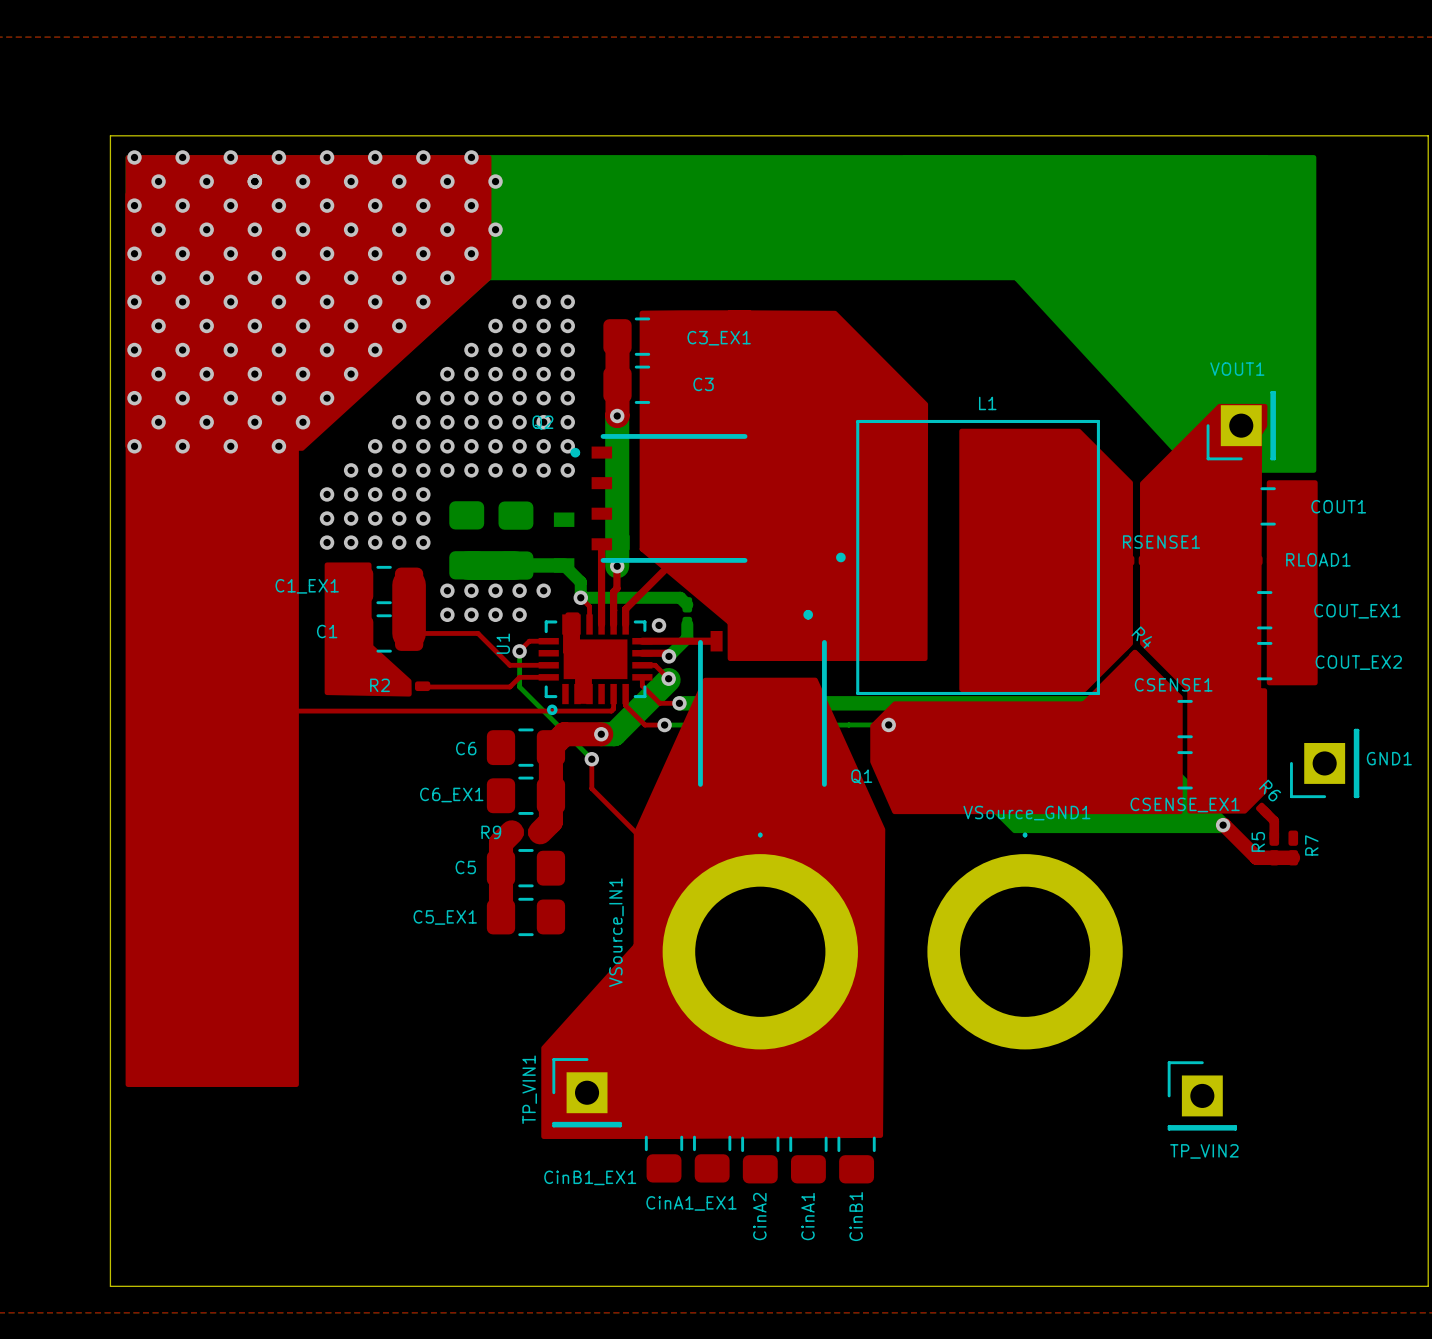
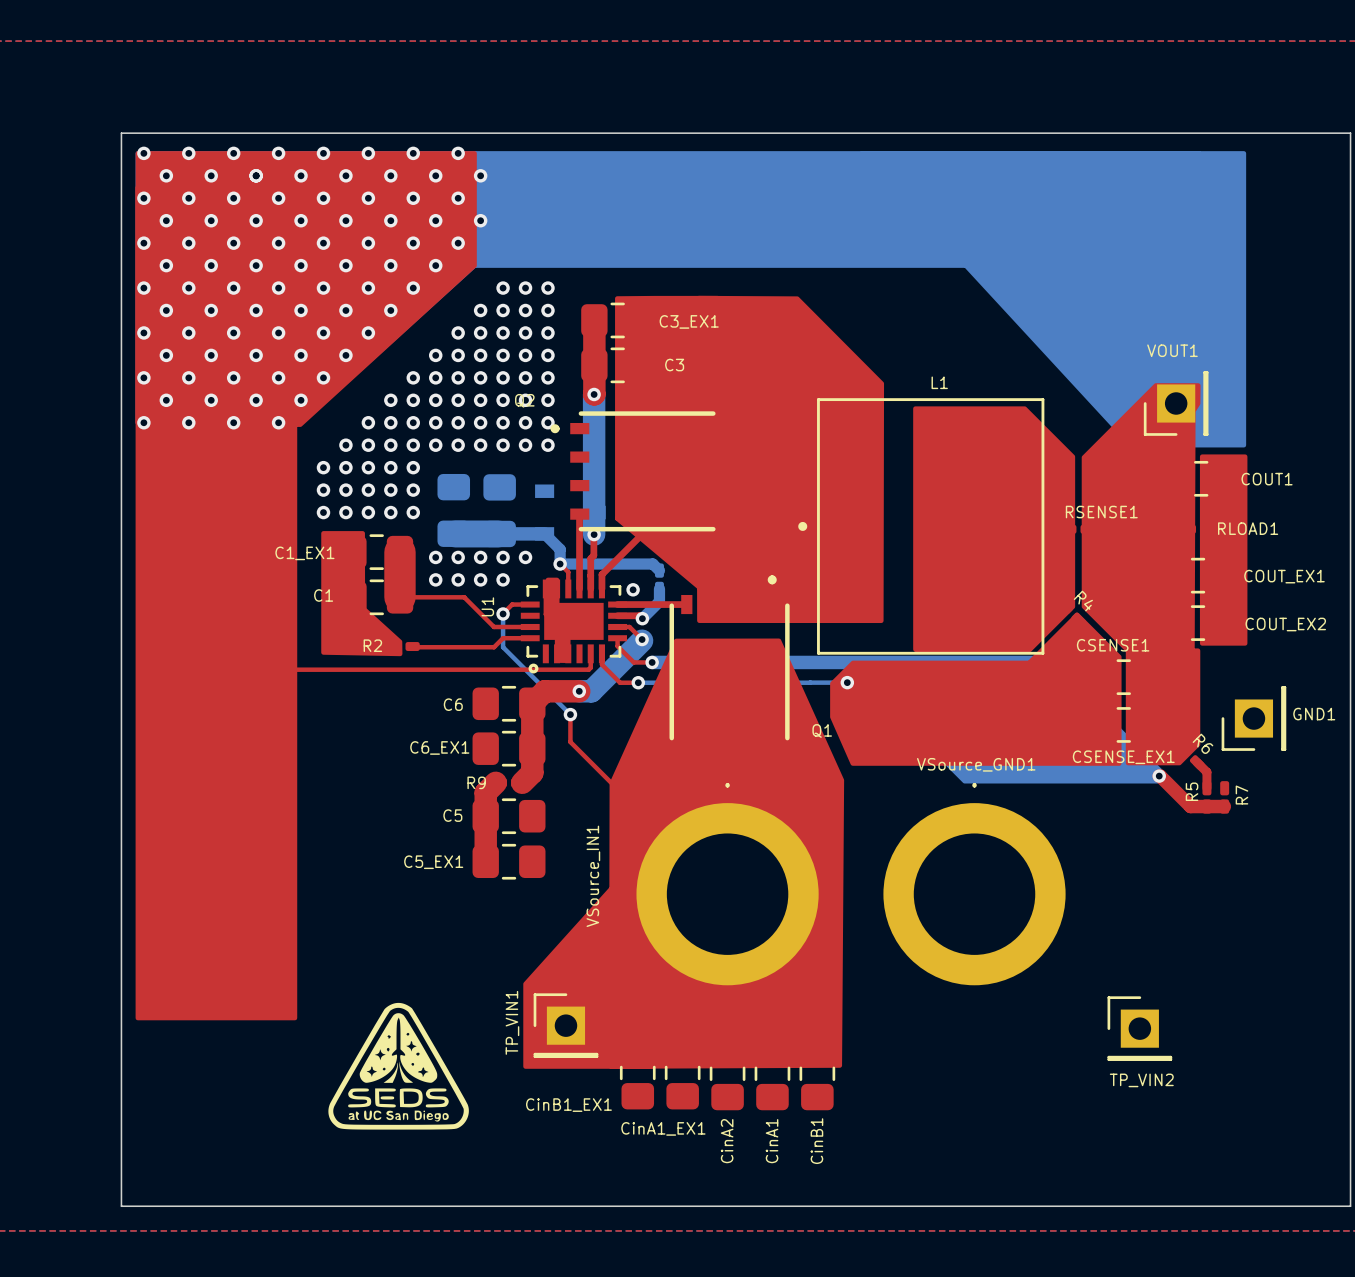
drawing: none -> [328, 1002, 469, 1130]

